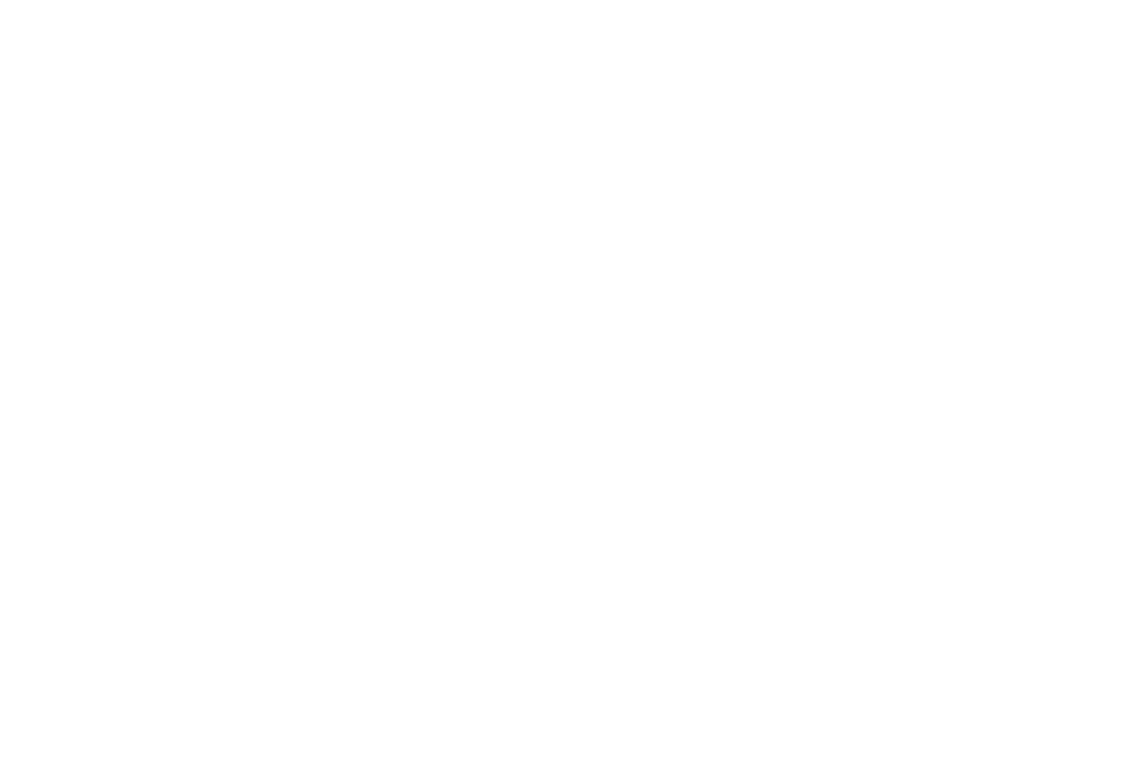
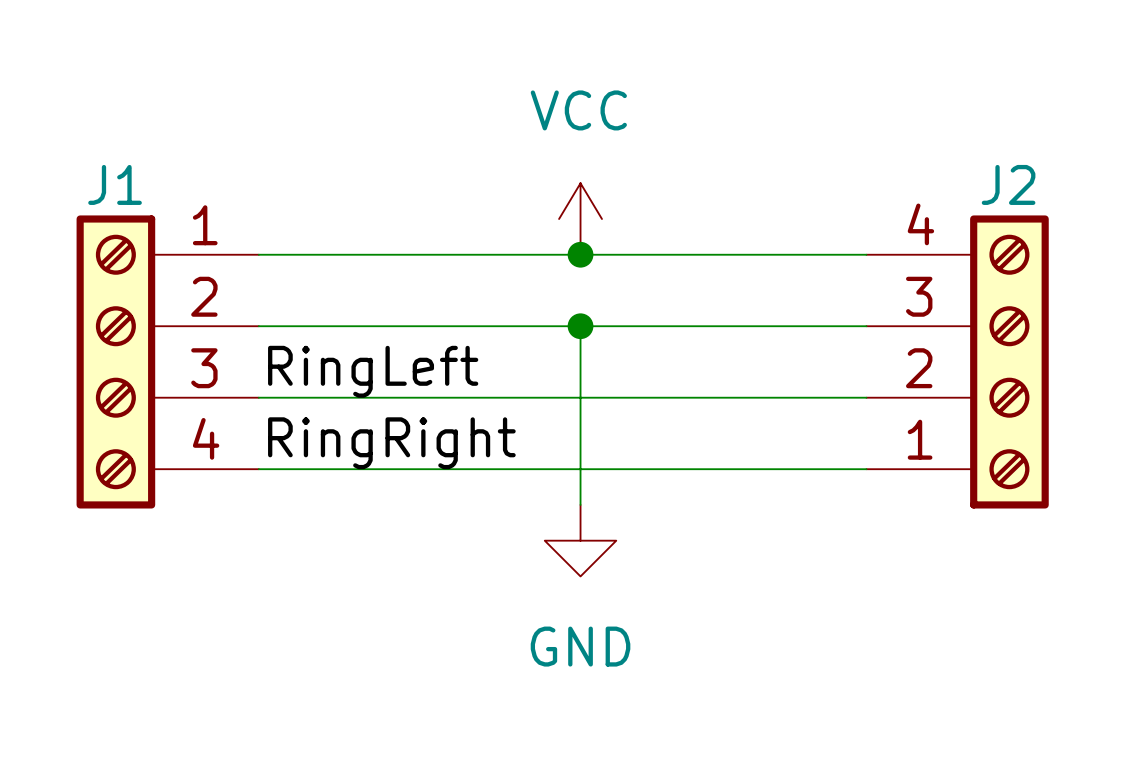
power symbol: none -> VCC (580, 219)
wire: none -> (258, 254) (866, 254)
junction: none -> (580, 254)
wire: none -> (258, 326) (866, 326)
wire: none -> (580, 326) (580, 504)
junction: none -> (580, 326)
J1: none -> (167, 361)
J2: none -> (957, 361)
label: none -> RingLeft (373, 371)
wire: none -> (258, 397) (866, 397)
label: none -> RingRight (391, 443)
wire: none -> (258, 469) (866, 469)
power symbol: none -> GND (580, 540)

